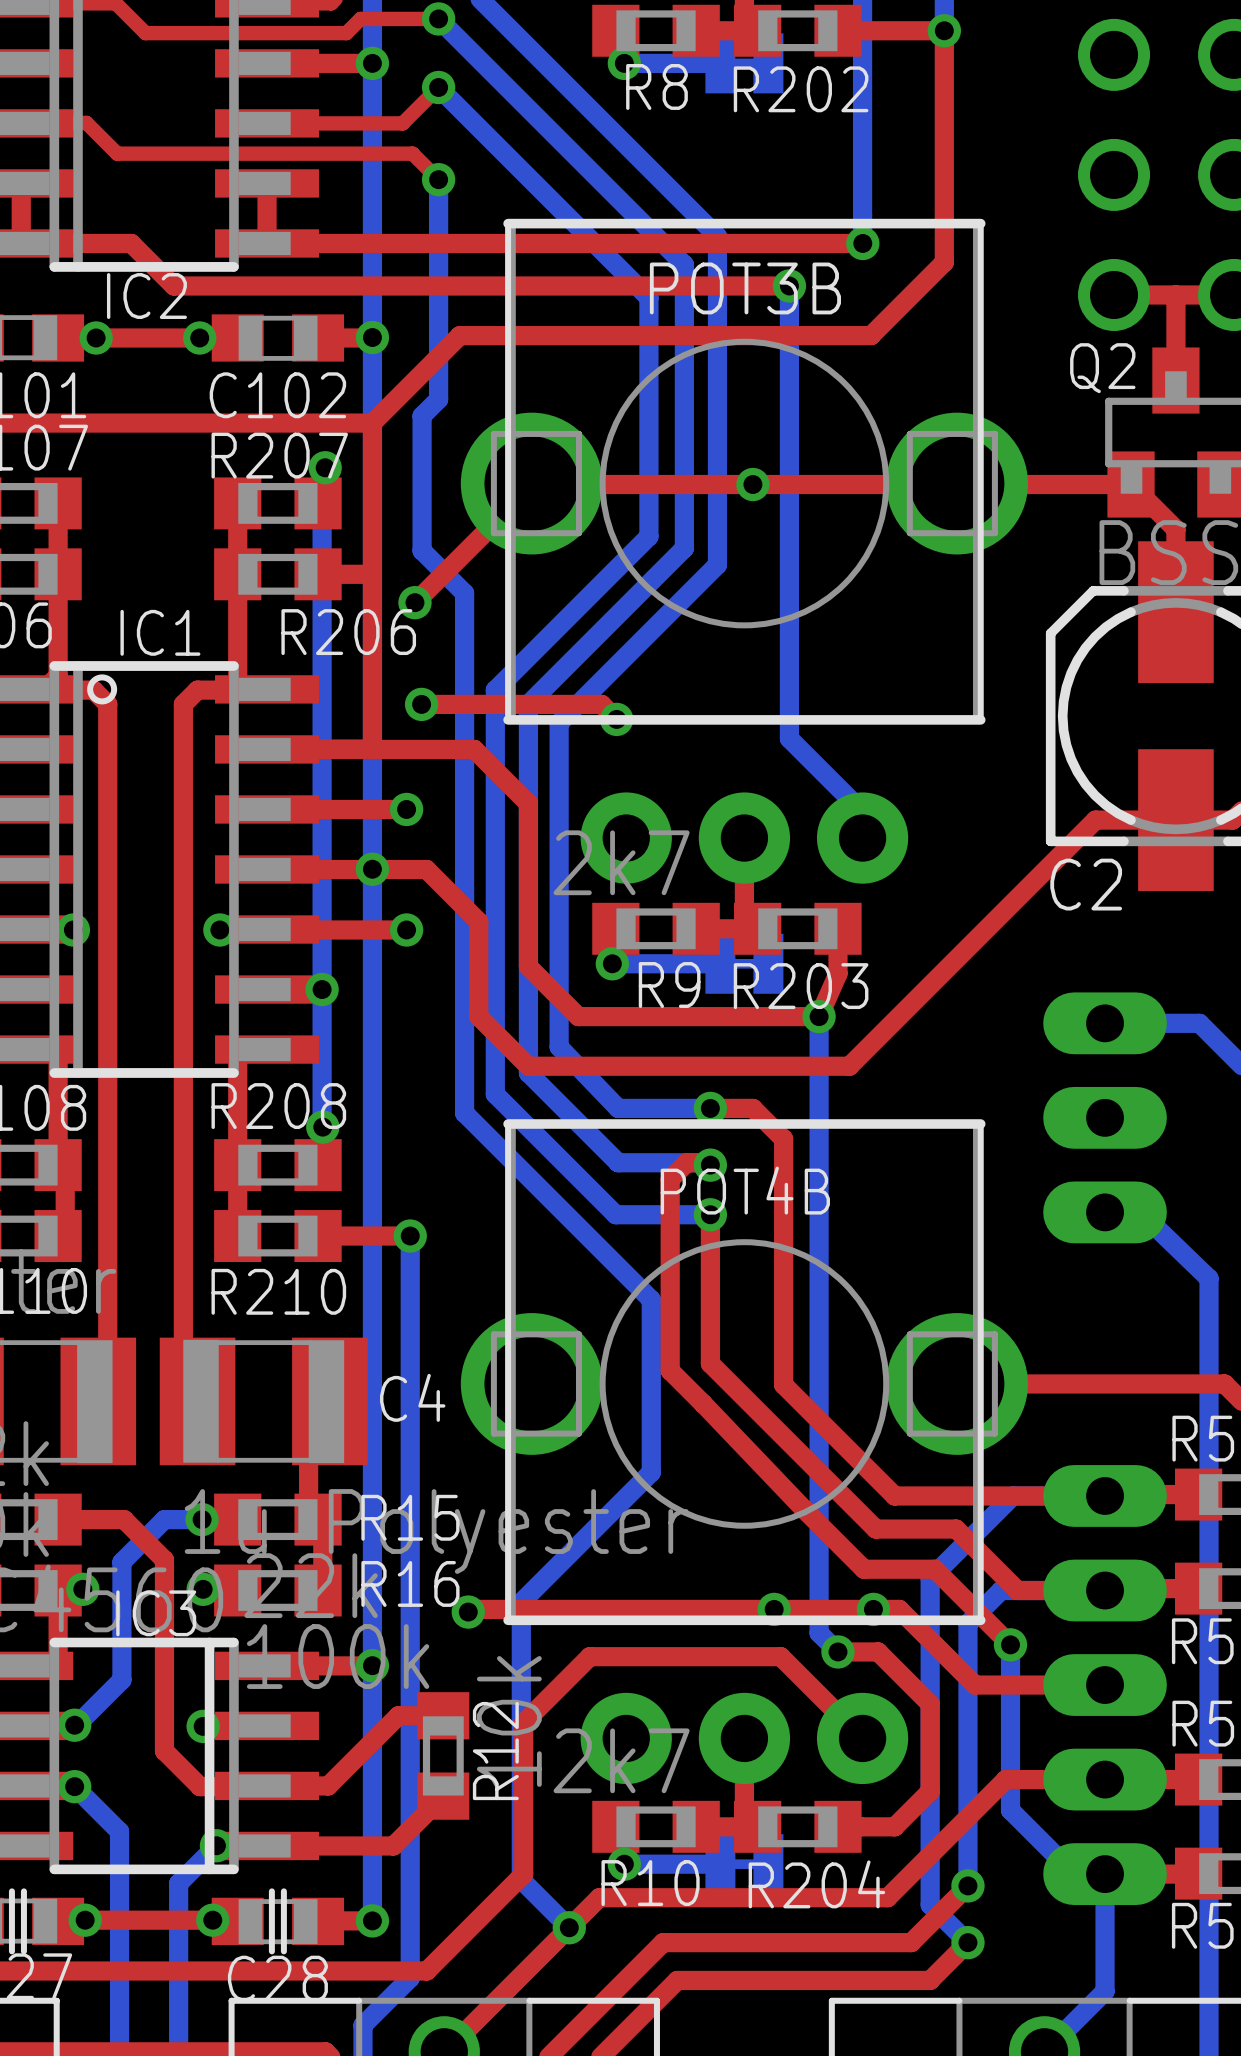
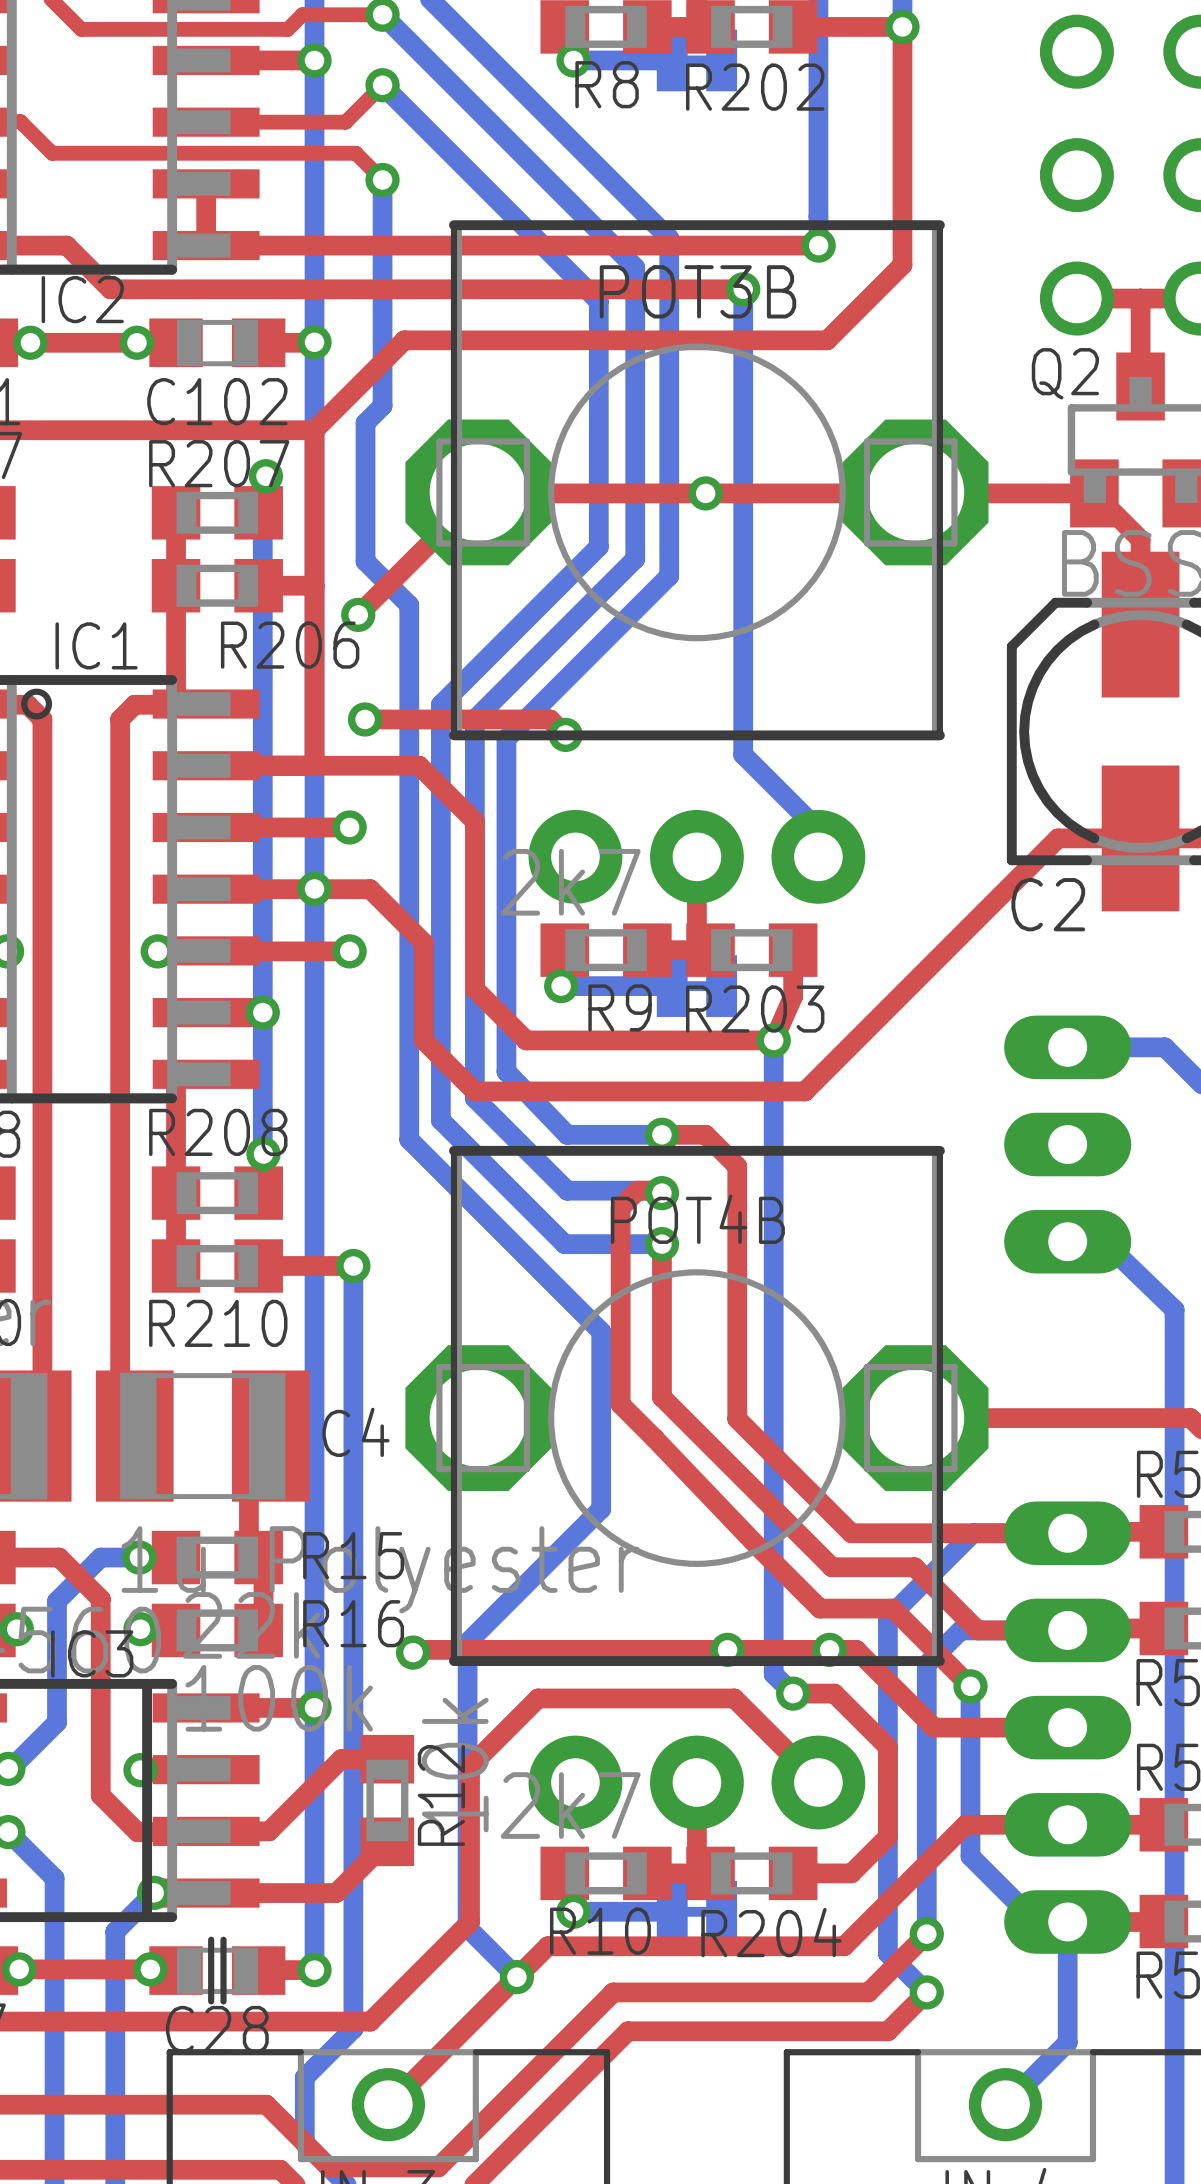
POT3B footprint: [460, 218, 1029, 884] -> [405, 220, 989, 904]
POT4B footprint: [460, 1119, 1029, 1785] -> [405, 1145, 989, 1830]

